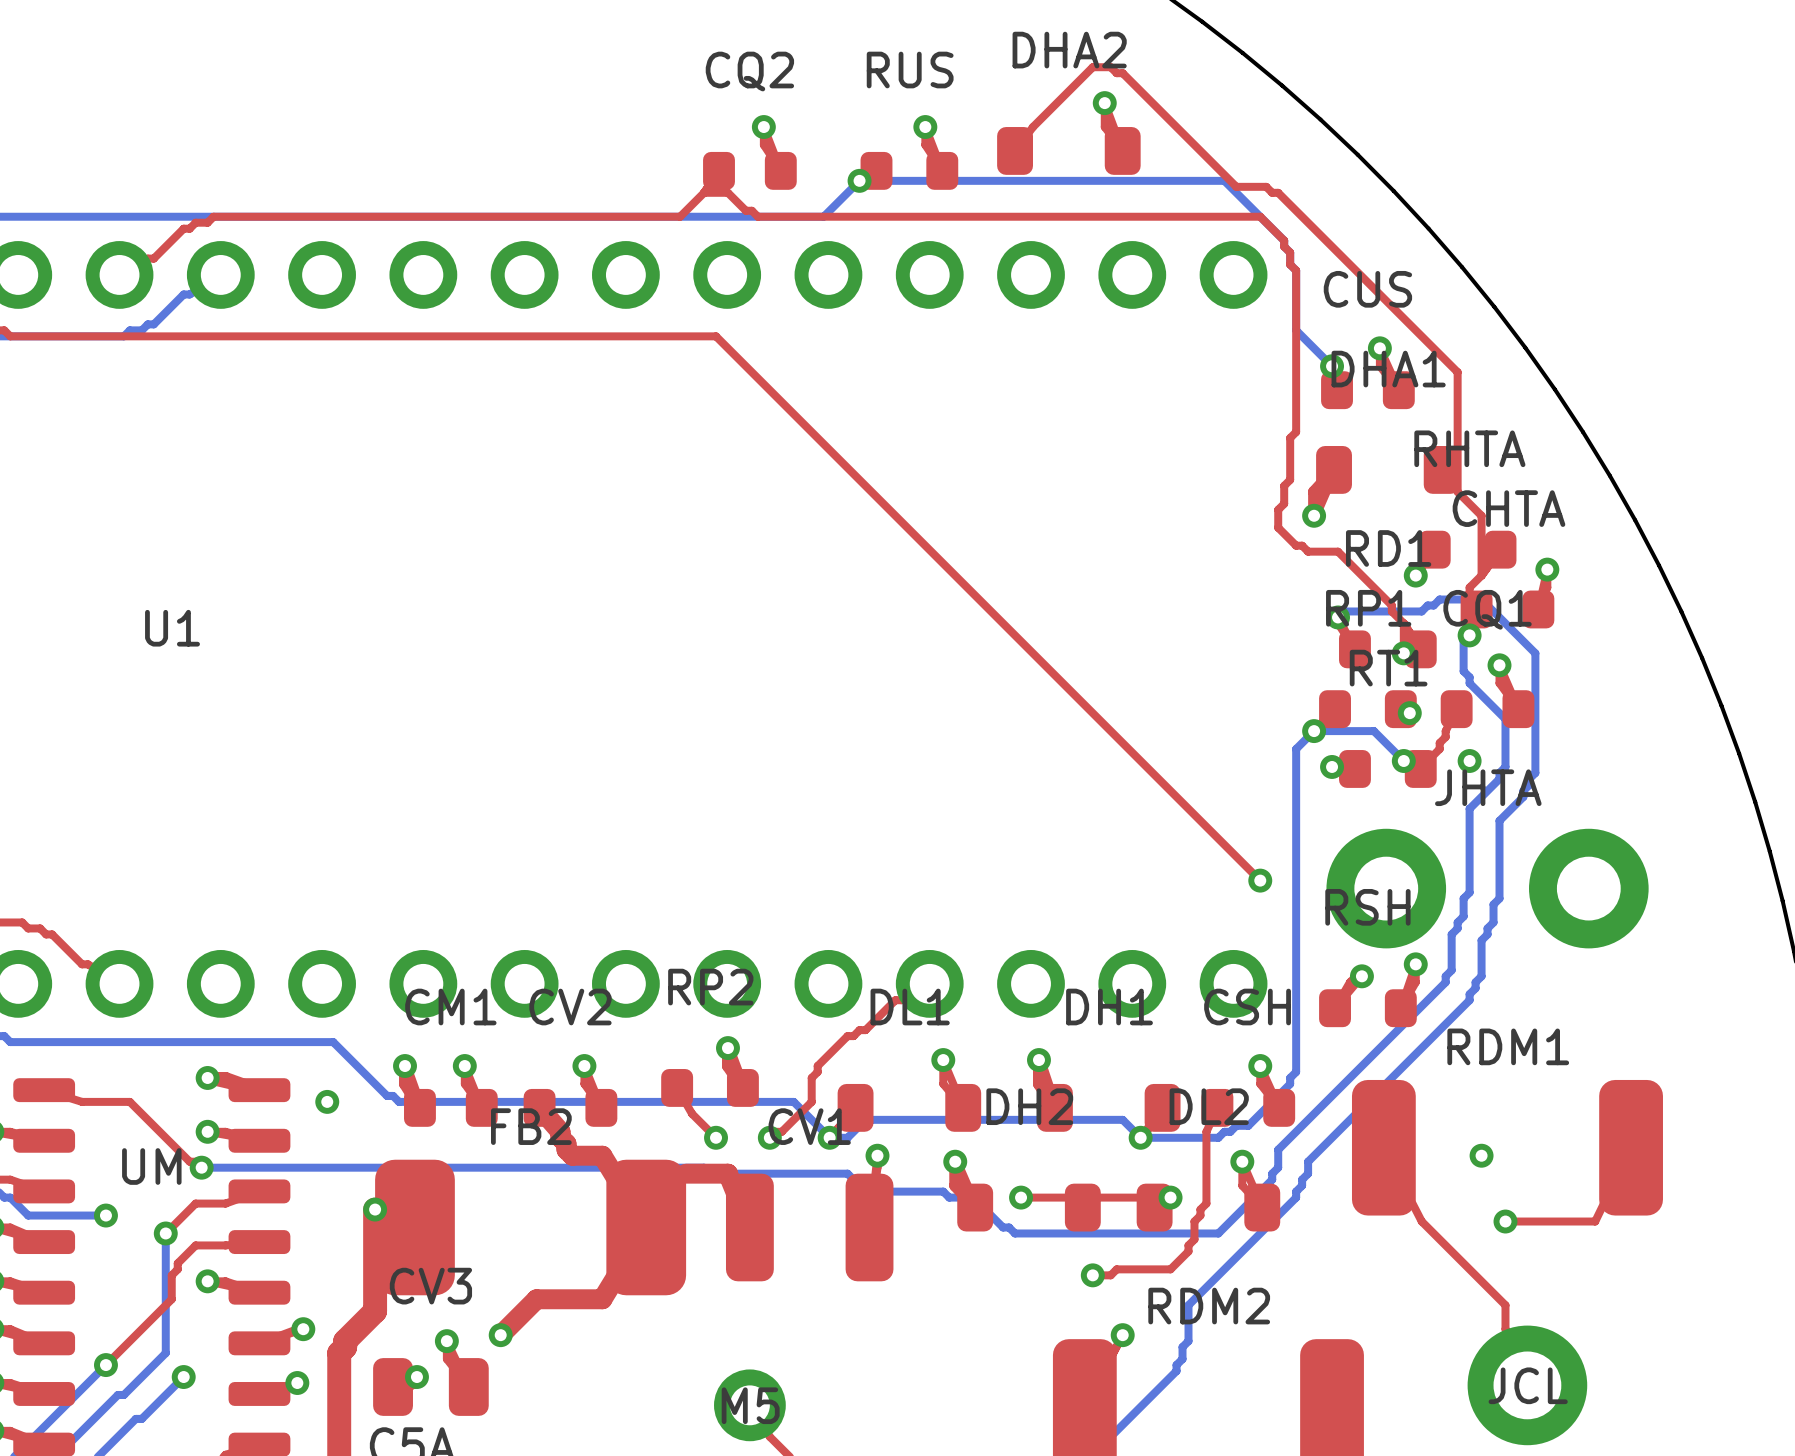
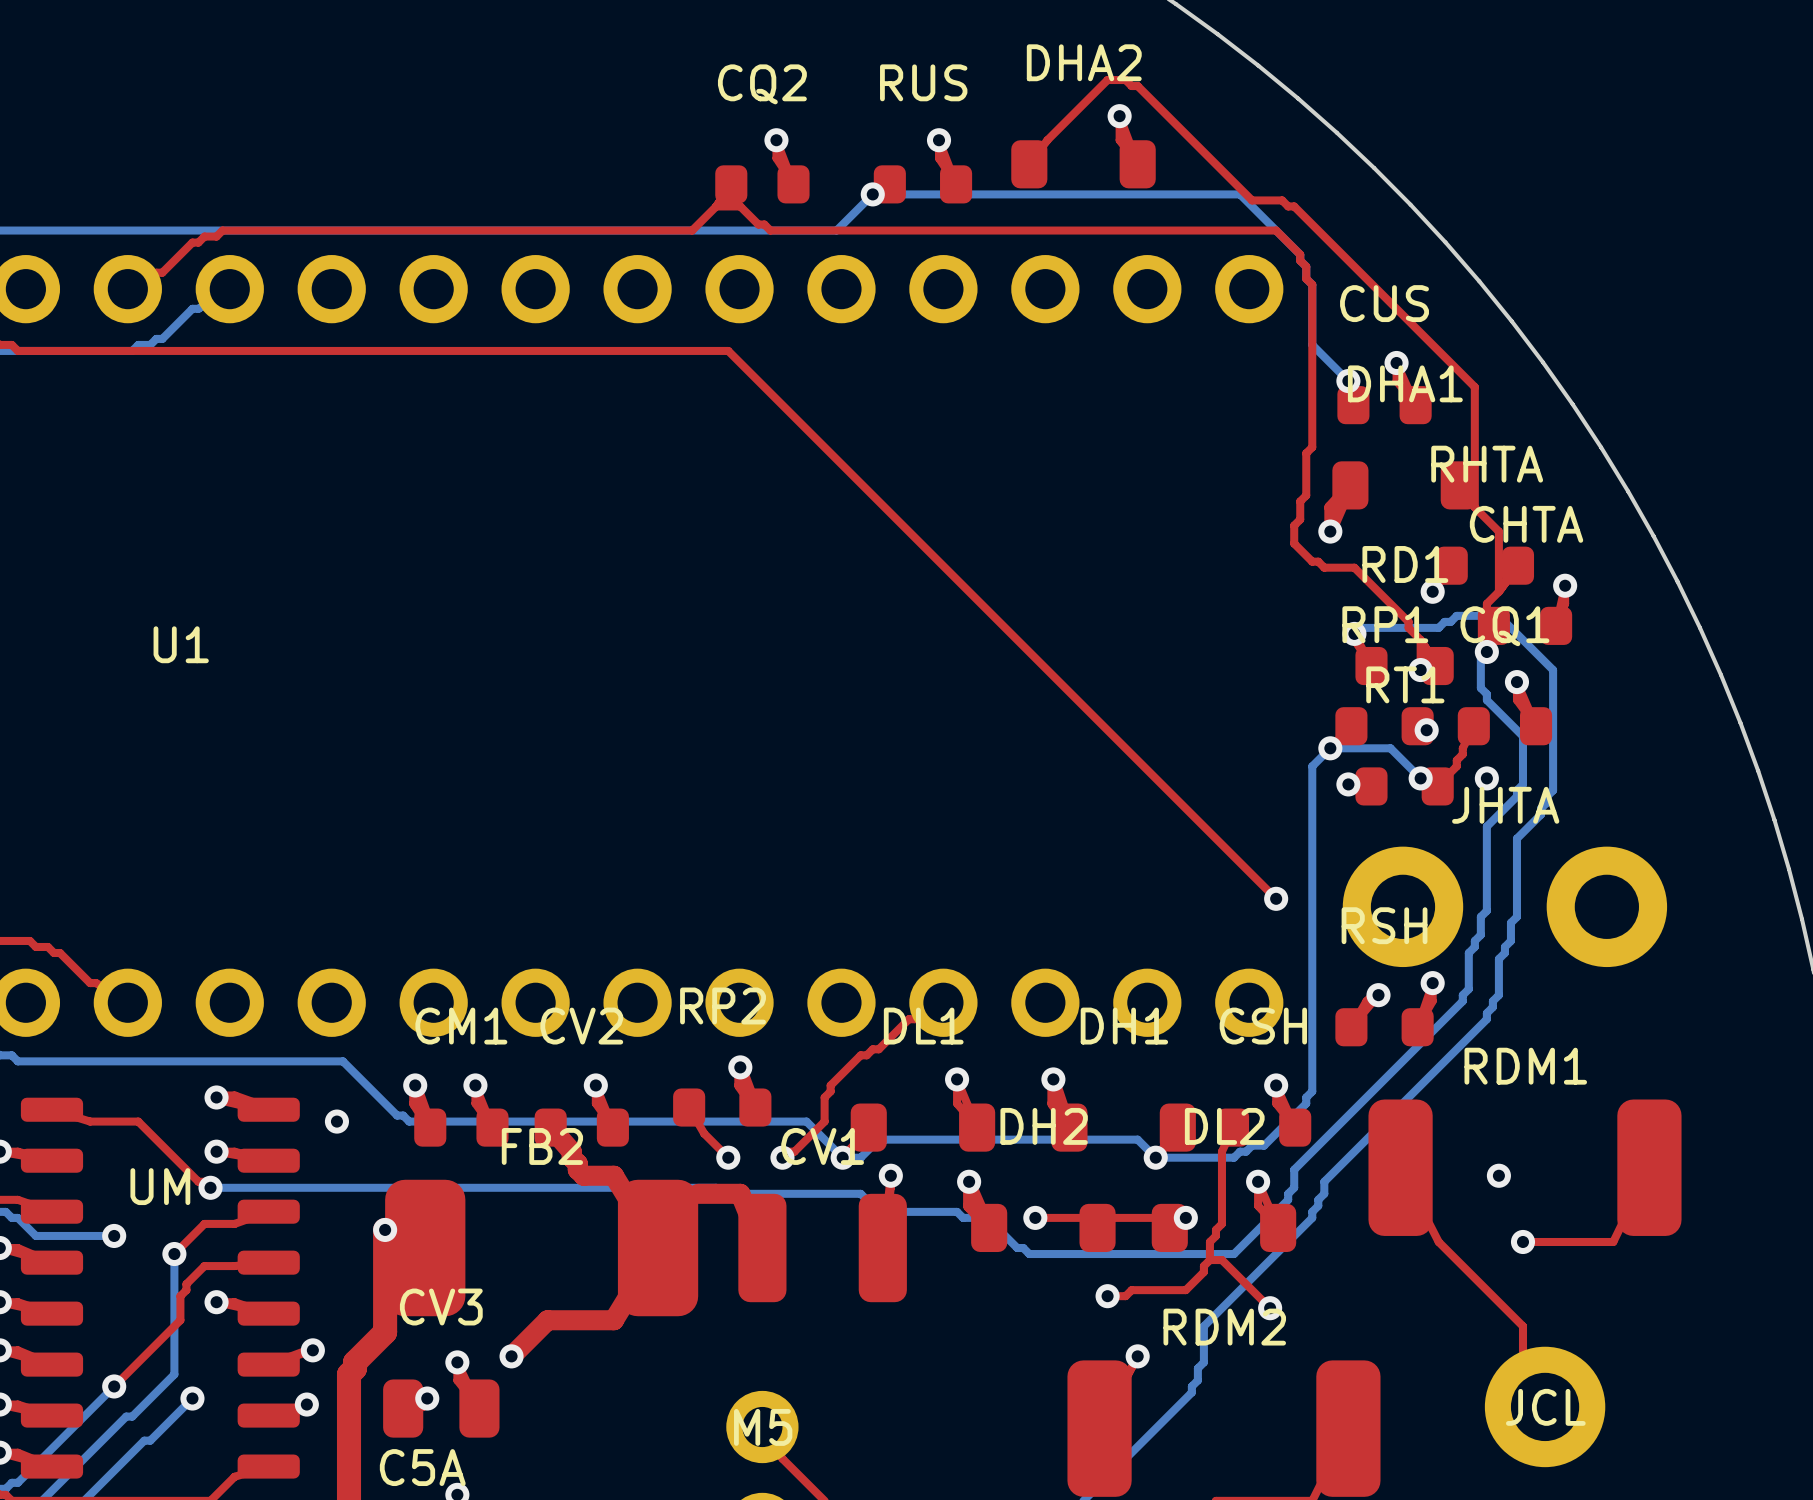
top track: none -> (1209, 1260) (1221, 1260) (1270, 1308)
via: none -> (1270, 1308)

